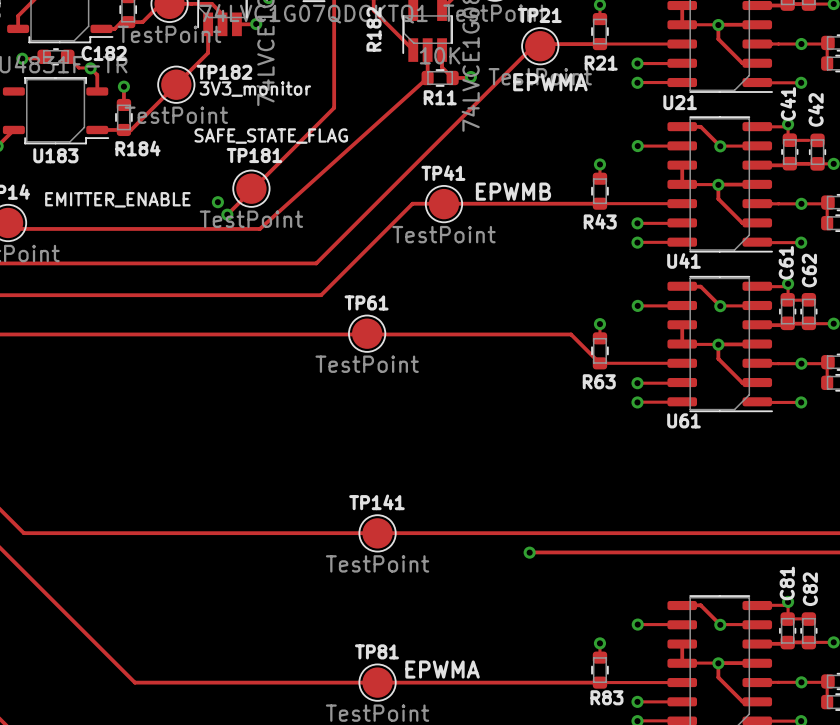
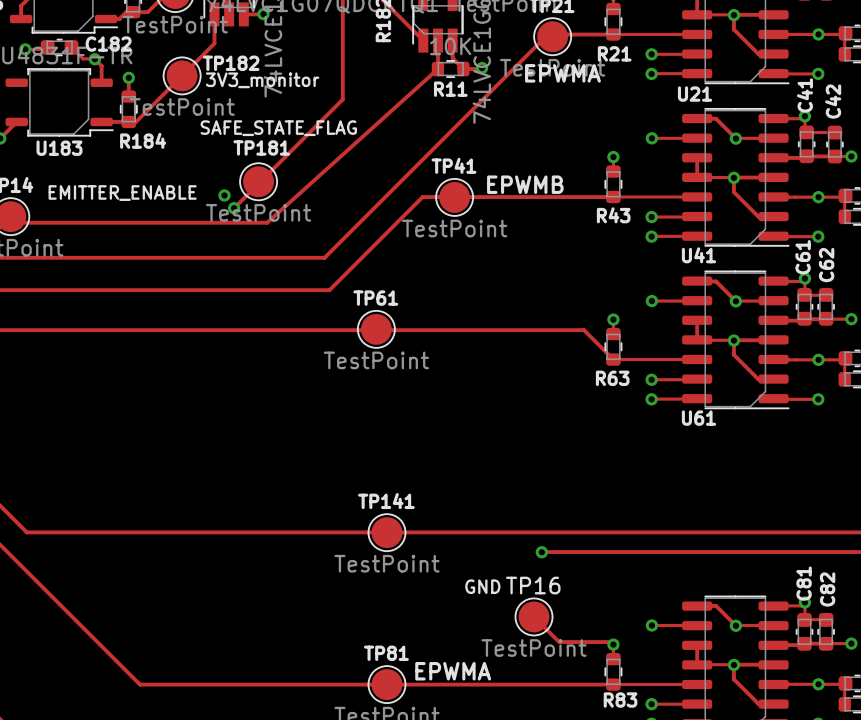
text: none -> GND (482, 586)
track: none -> (534, 616) (559, 642) (613, 642)
TP16: none -> TestPoint (534, 616)

